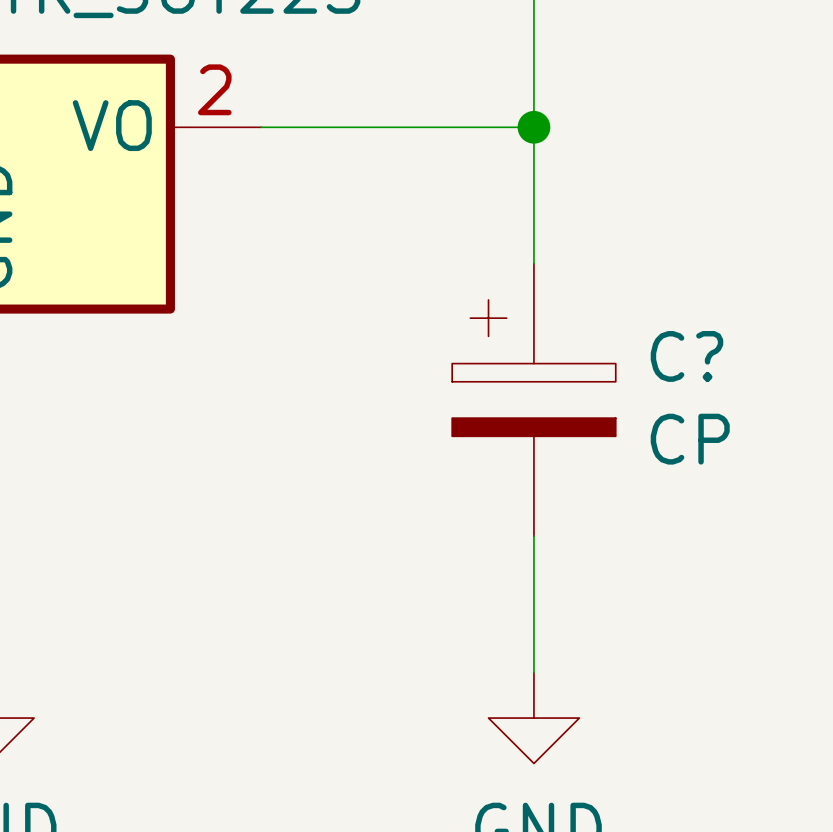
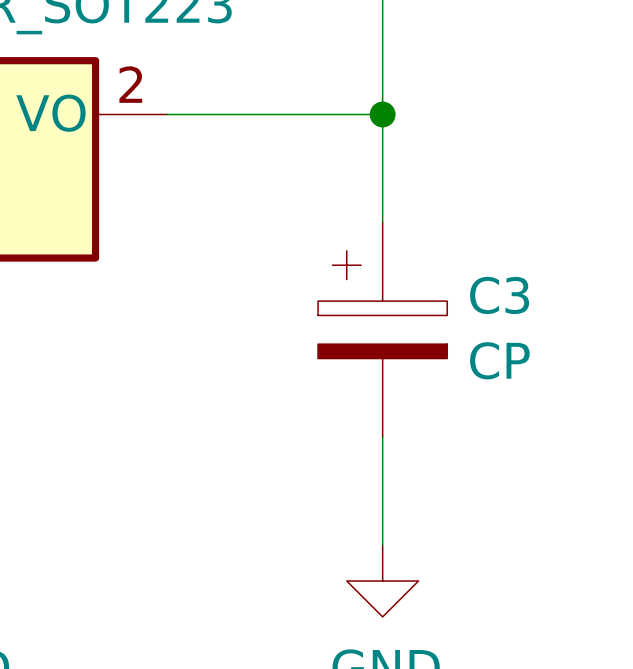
C? name: C? (686, 356) -> C3 (499, 295)

